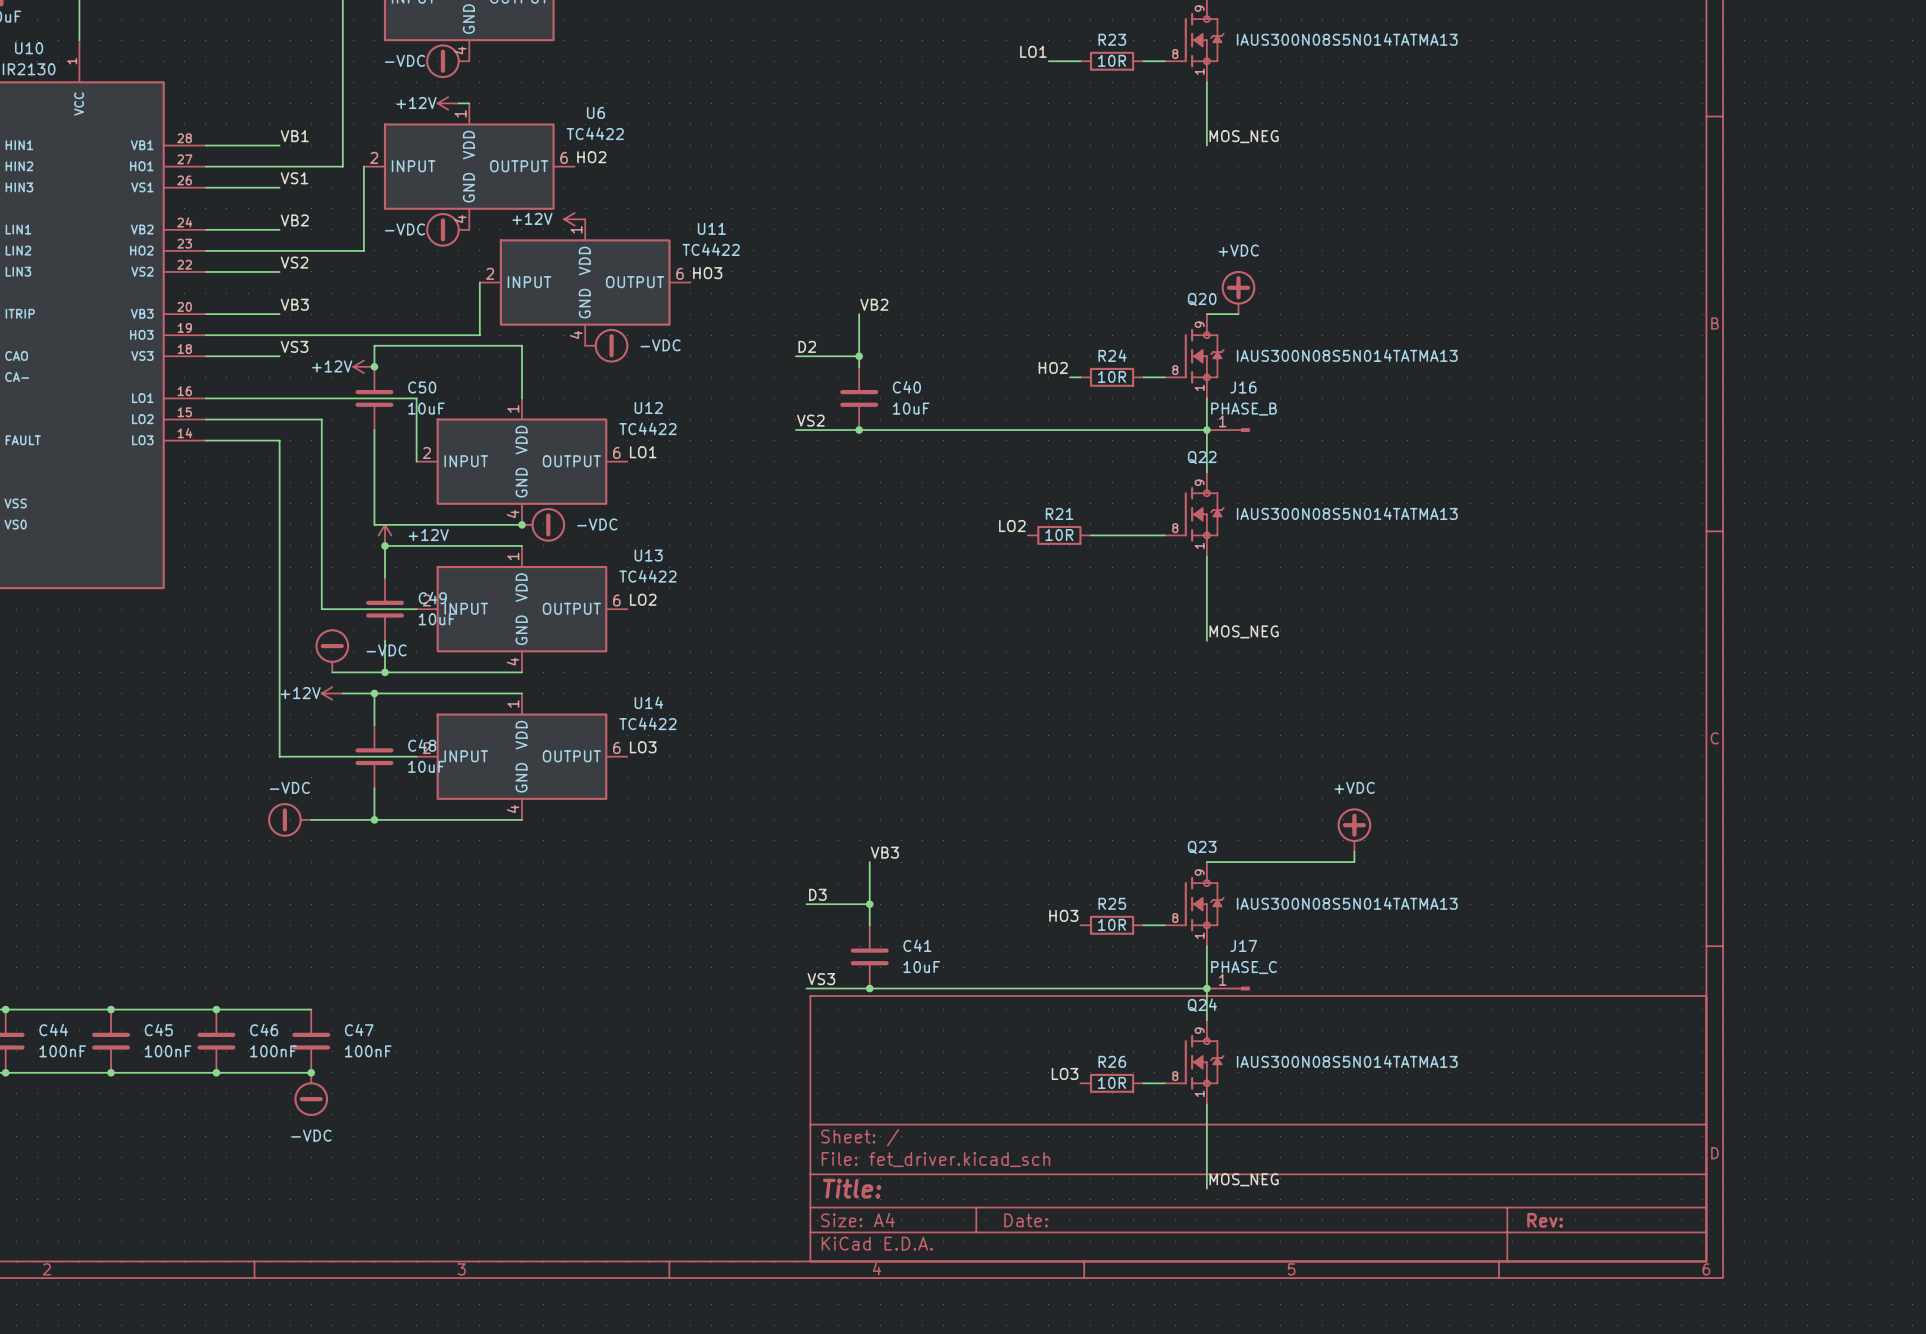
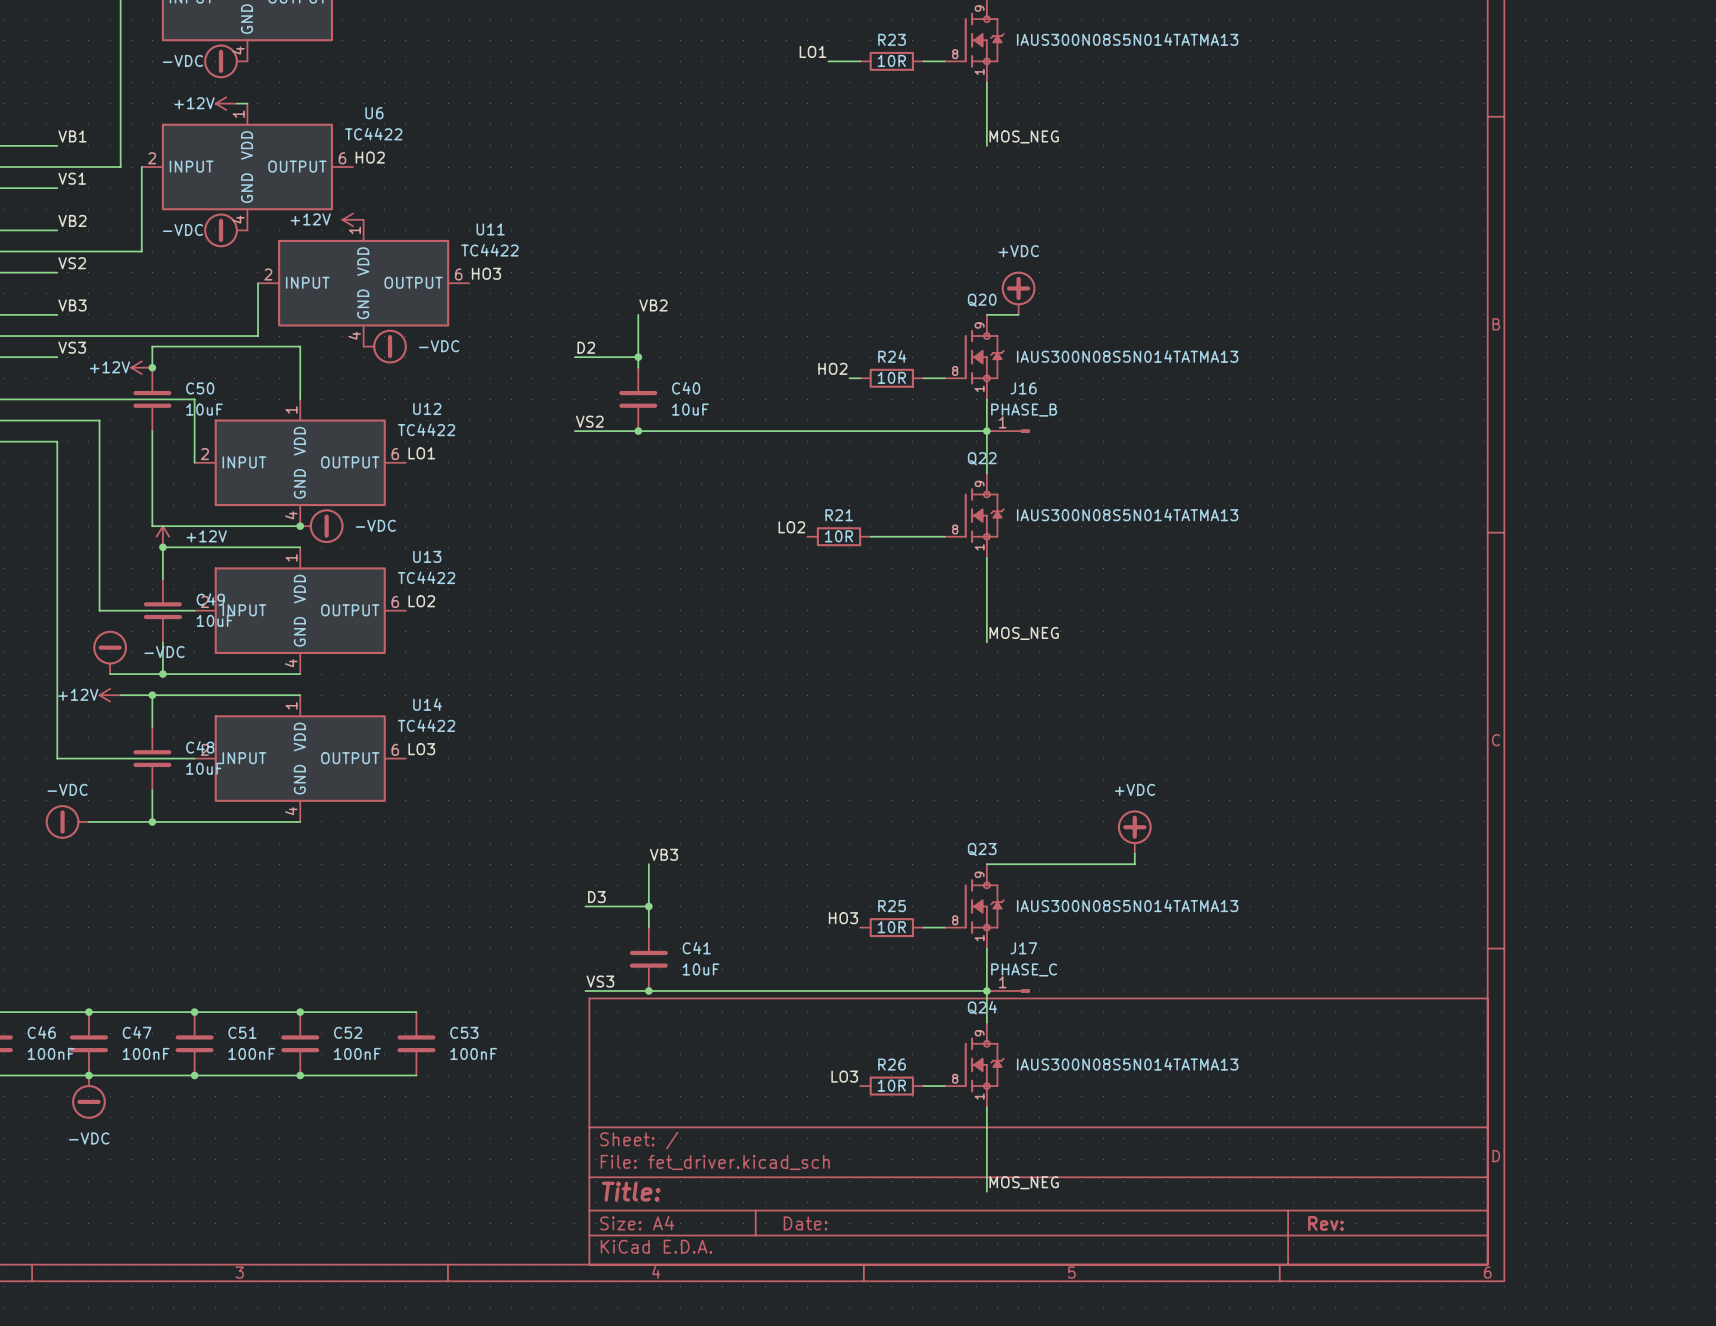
wire: none -> (88, 1012) (416, 1012)
junction: none -> (88, 1012)
junction: none -> (194, 1012)
junction: none -> (300, 1012)
C51: none -> 100nF (194, 1043)
C52: none -> 100nF (300, 1043)
C53: none -> 100nF (416, 1043)
wire: none -> (88, 1075) (416, 1075)
junction: none -> (194, 1075)
junction: none -> (300, 1075)

